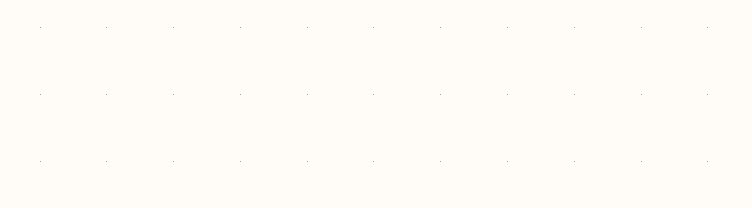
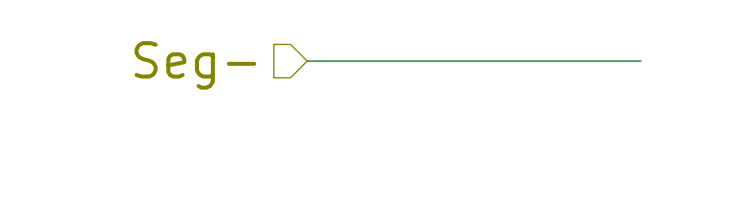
wire: none -> (307, 61) (641, 61)
hierarchical label: none -> Seg- (195, 65)

